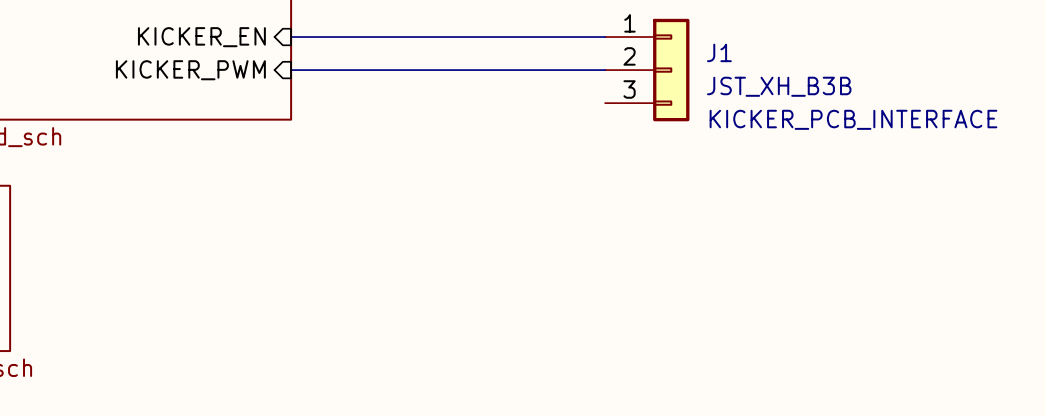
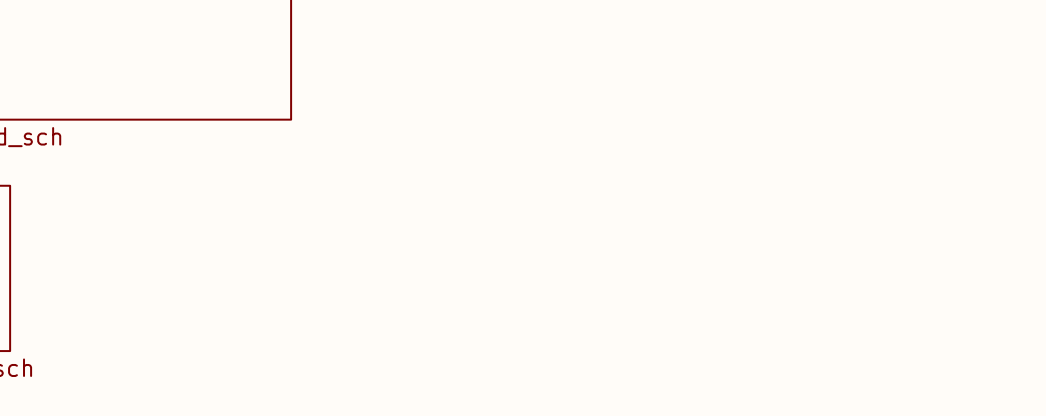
sheet pin: KICKER_EN (201, 37) -> none
wire: (291, 37) (605, 37) -> none
sheet pin: KICKER_PWM (190, 70) -> none
wire: (291, 70) (605, 70) -> none
J1: JST_XH_B3B (647, 70) -> none

